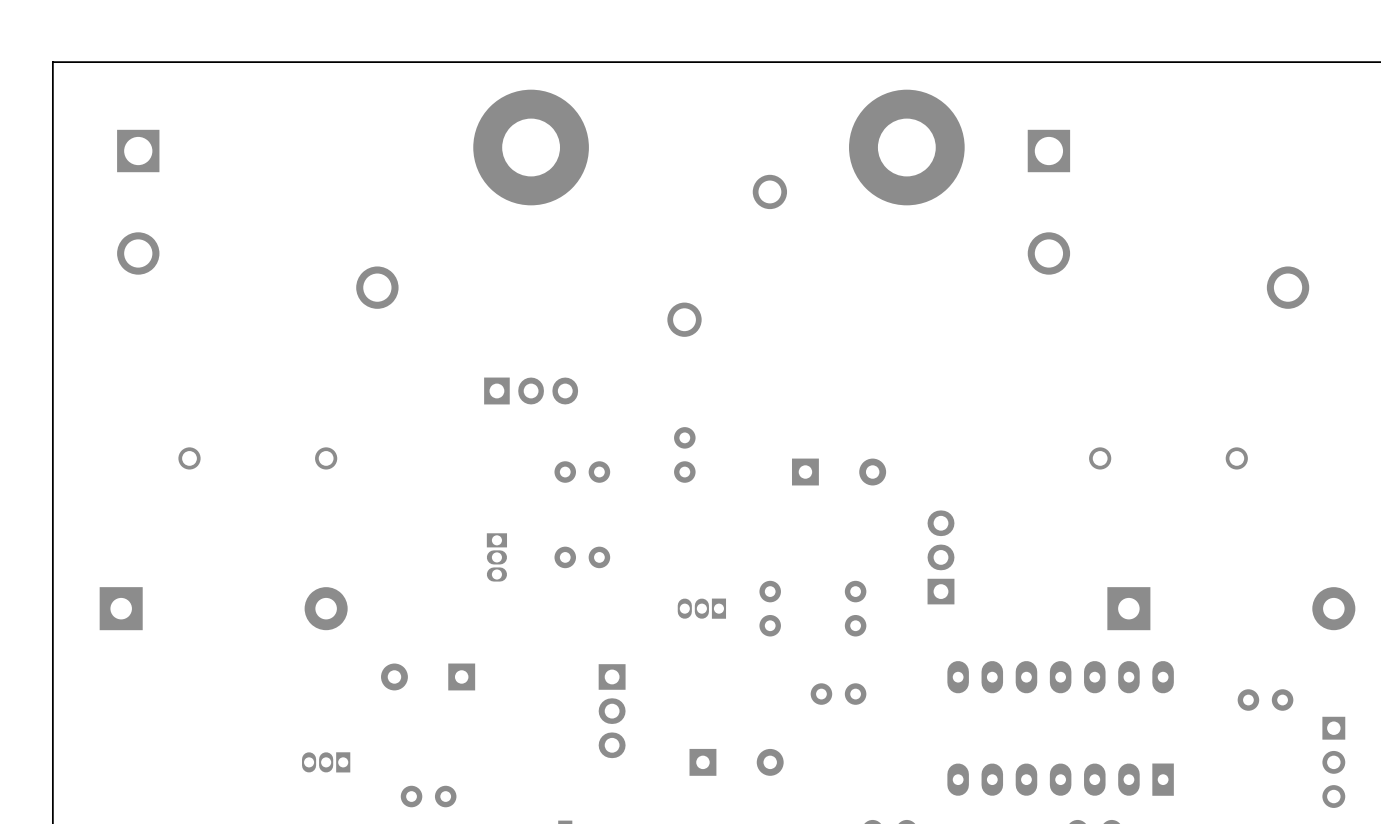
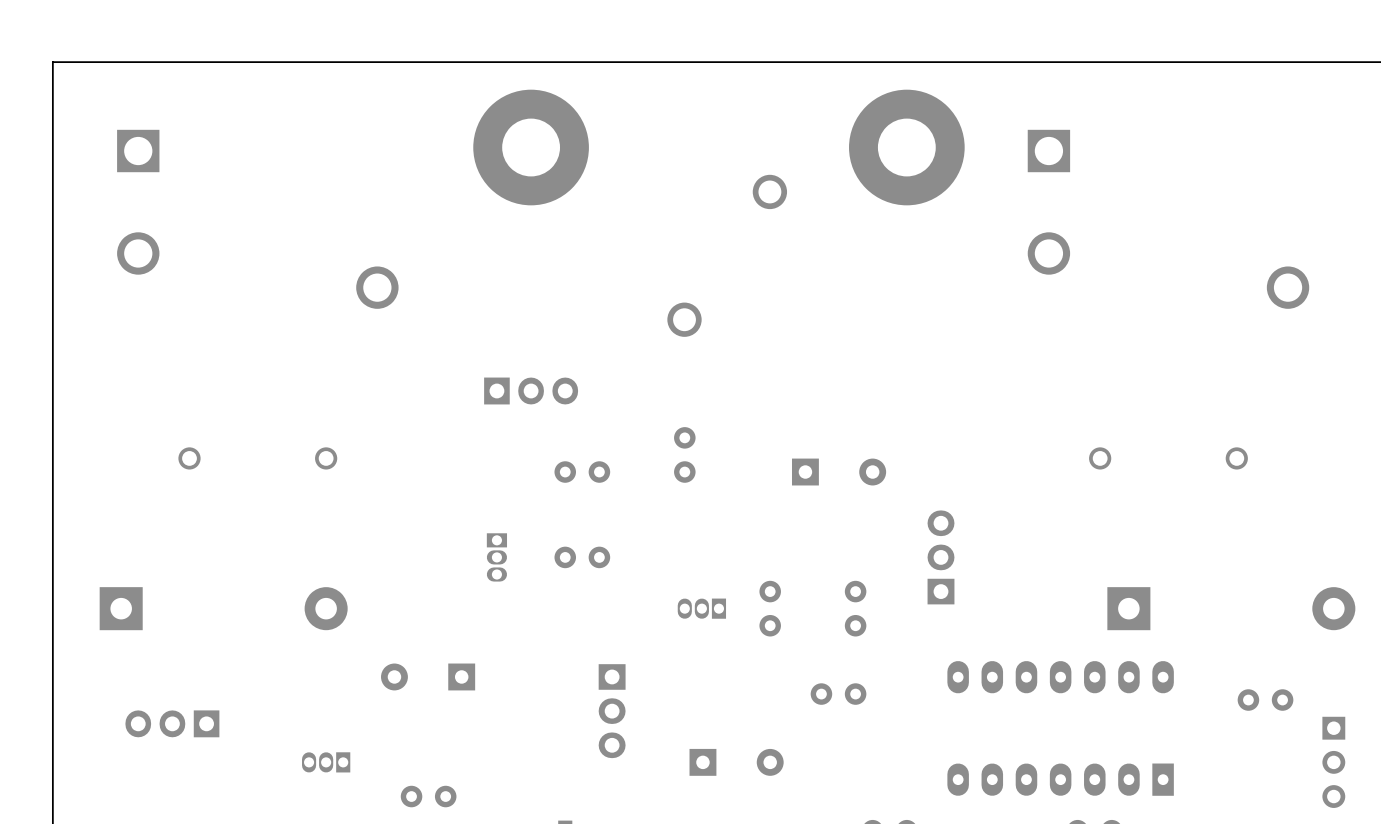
part: none -> (172, 723)

